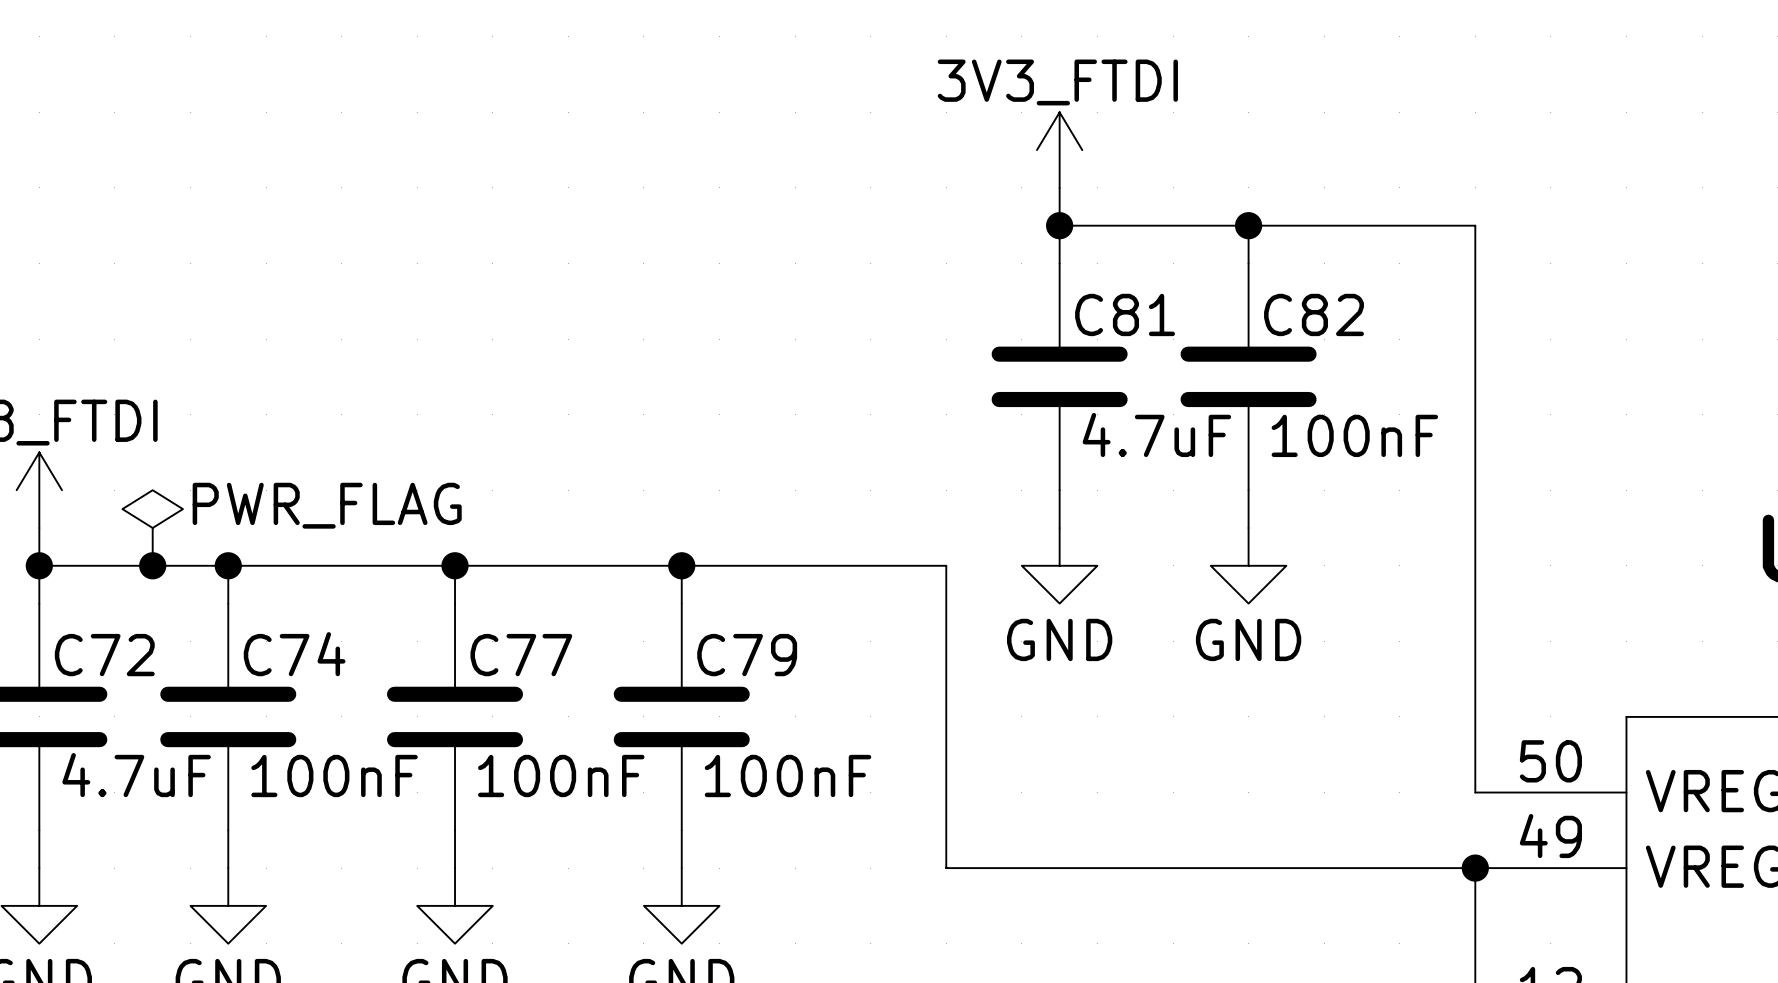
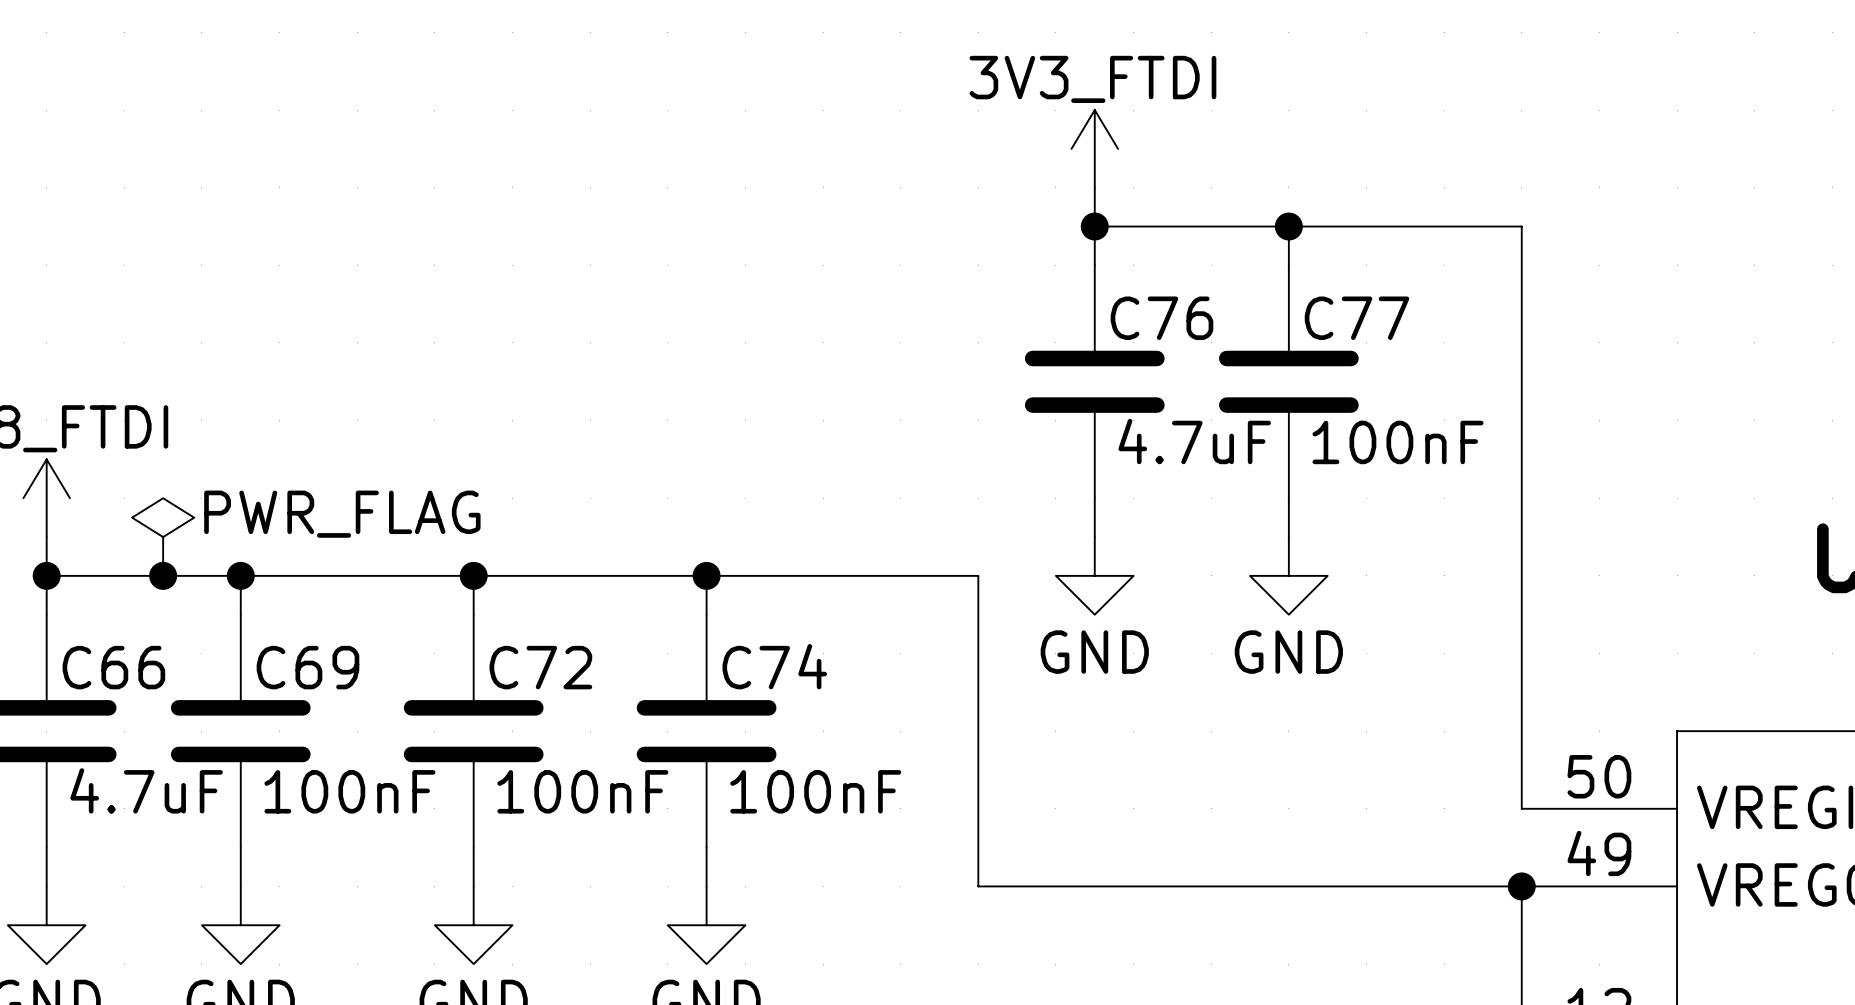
C81 name: C81 (1125, 314) -> C76 (1161, 318)
C82 name: C82 (1314, 314) -> C77 (1356, 318)
C74 name: C74 (294, 654) -> C69 (307, 667)
C72 name: C72 (104, 655) -> C66 (113, 667)
C77 name: C77 (521, 655) -> C72 (540, 667)
C79 name: C79 (747, 655) -> C74 (774, 666)

